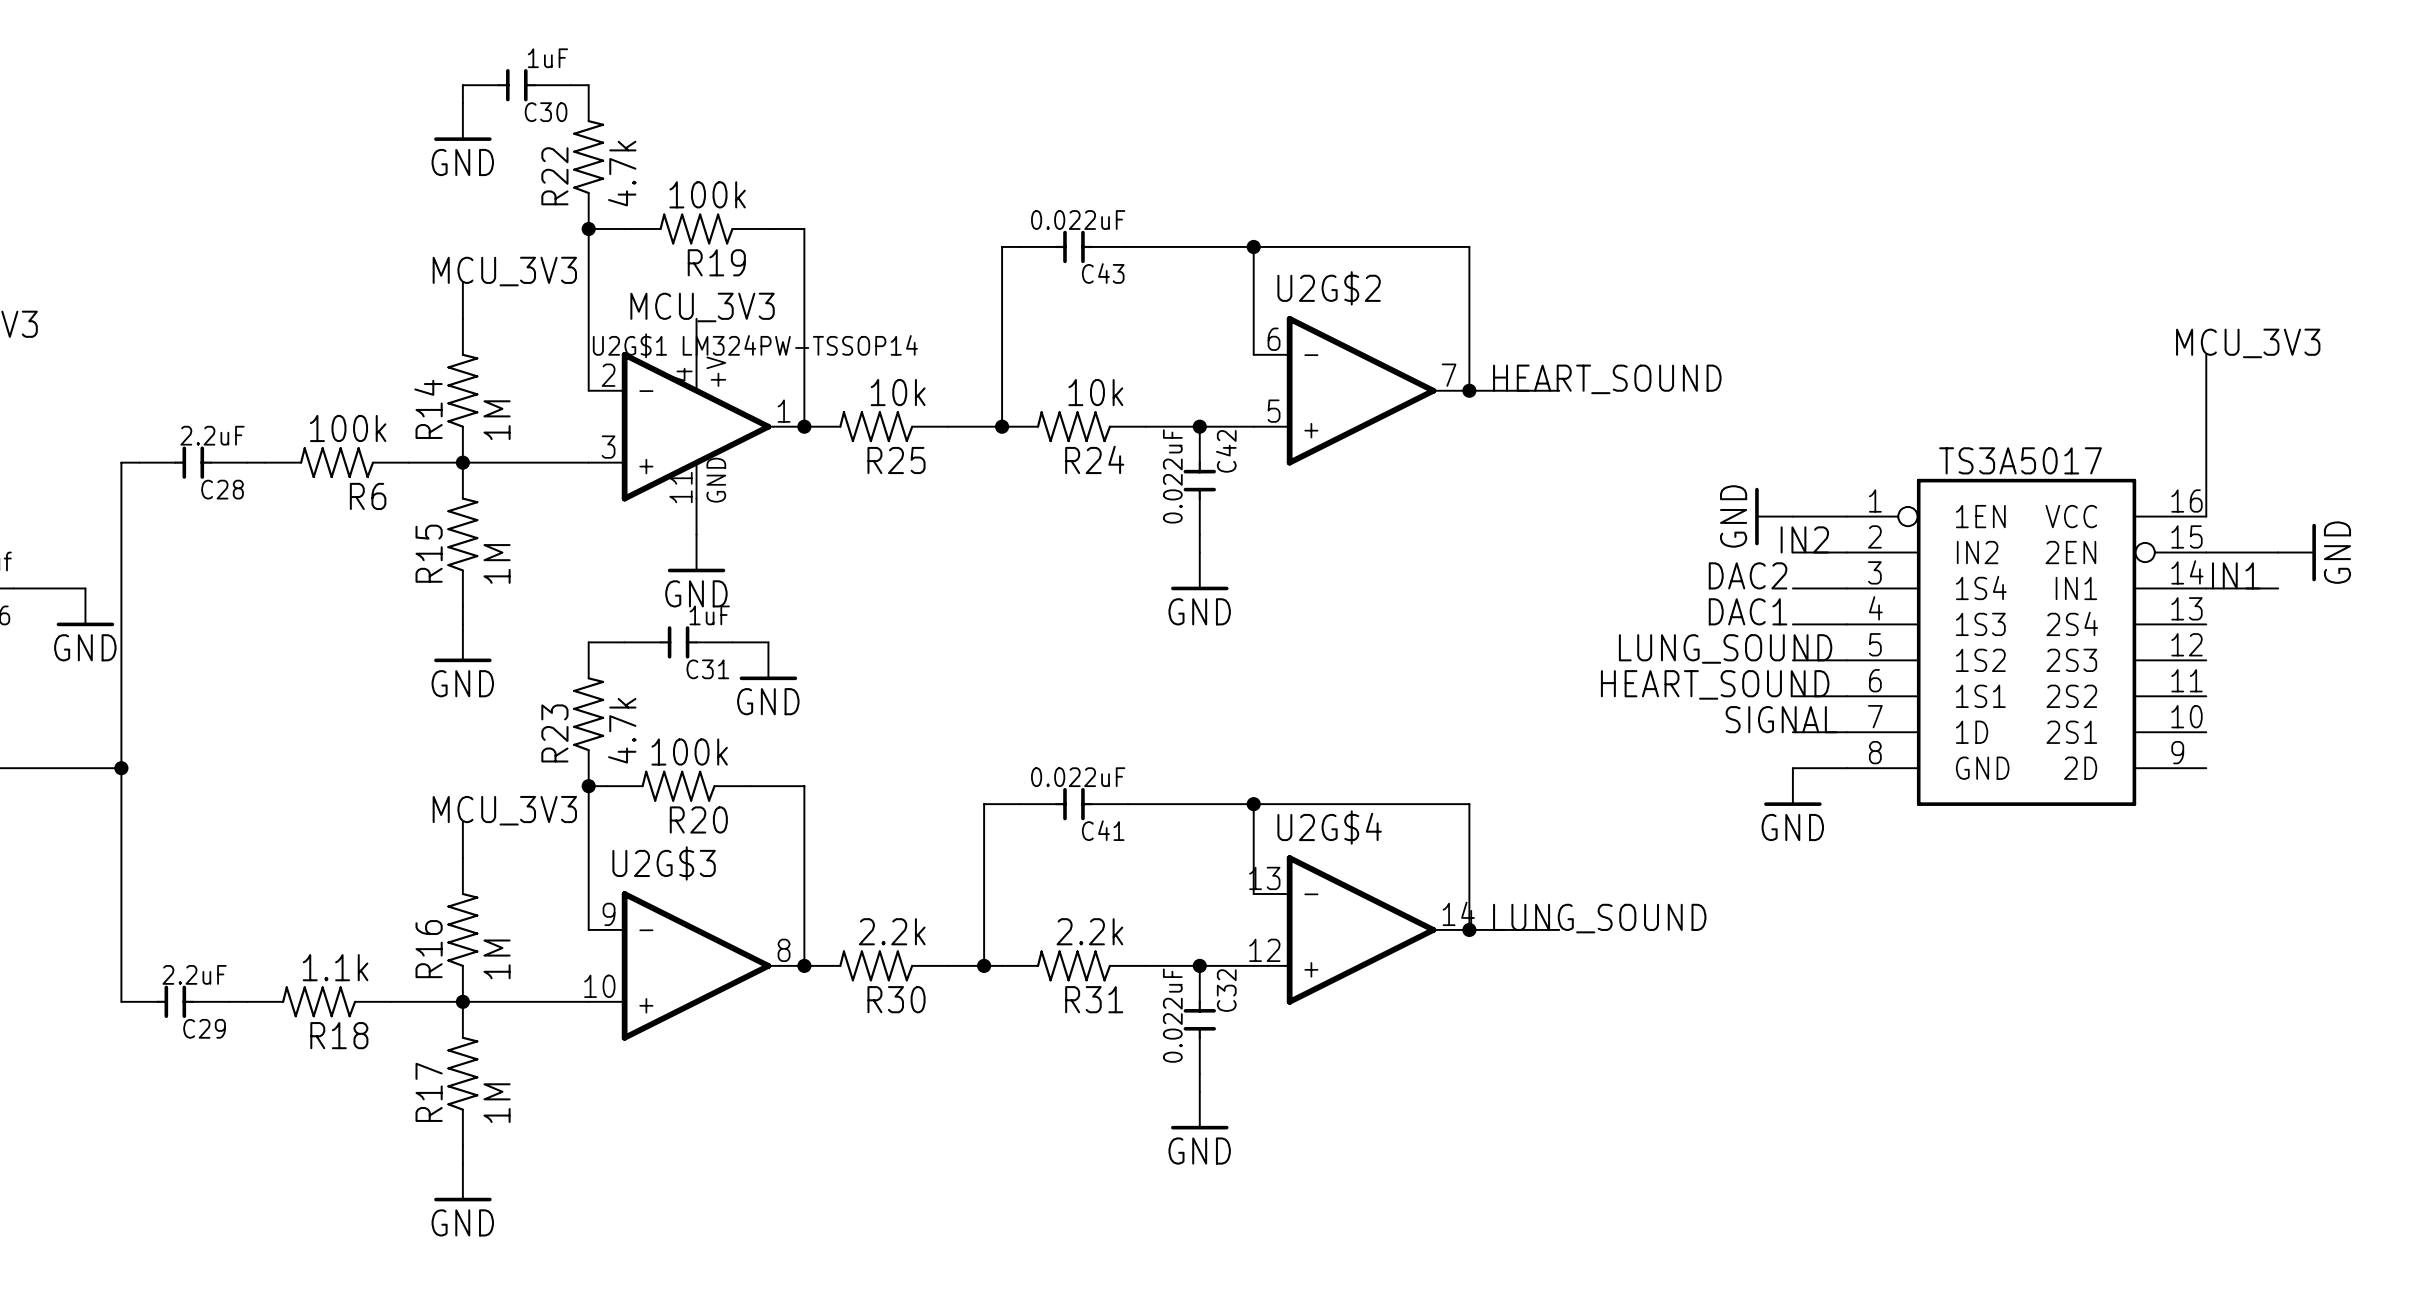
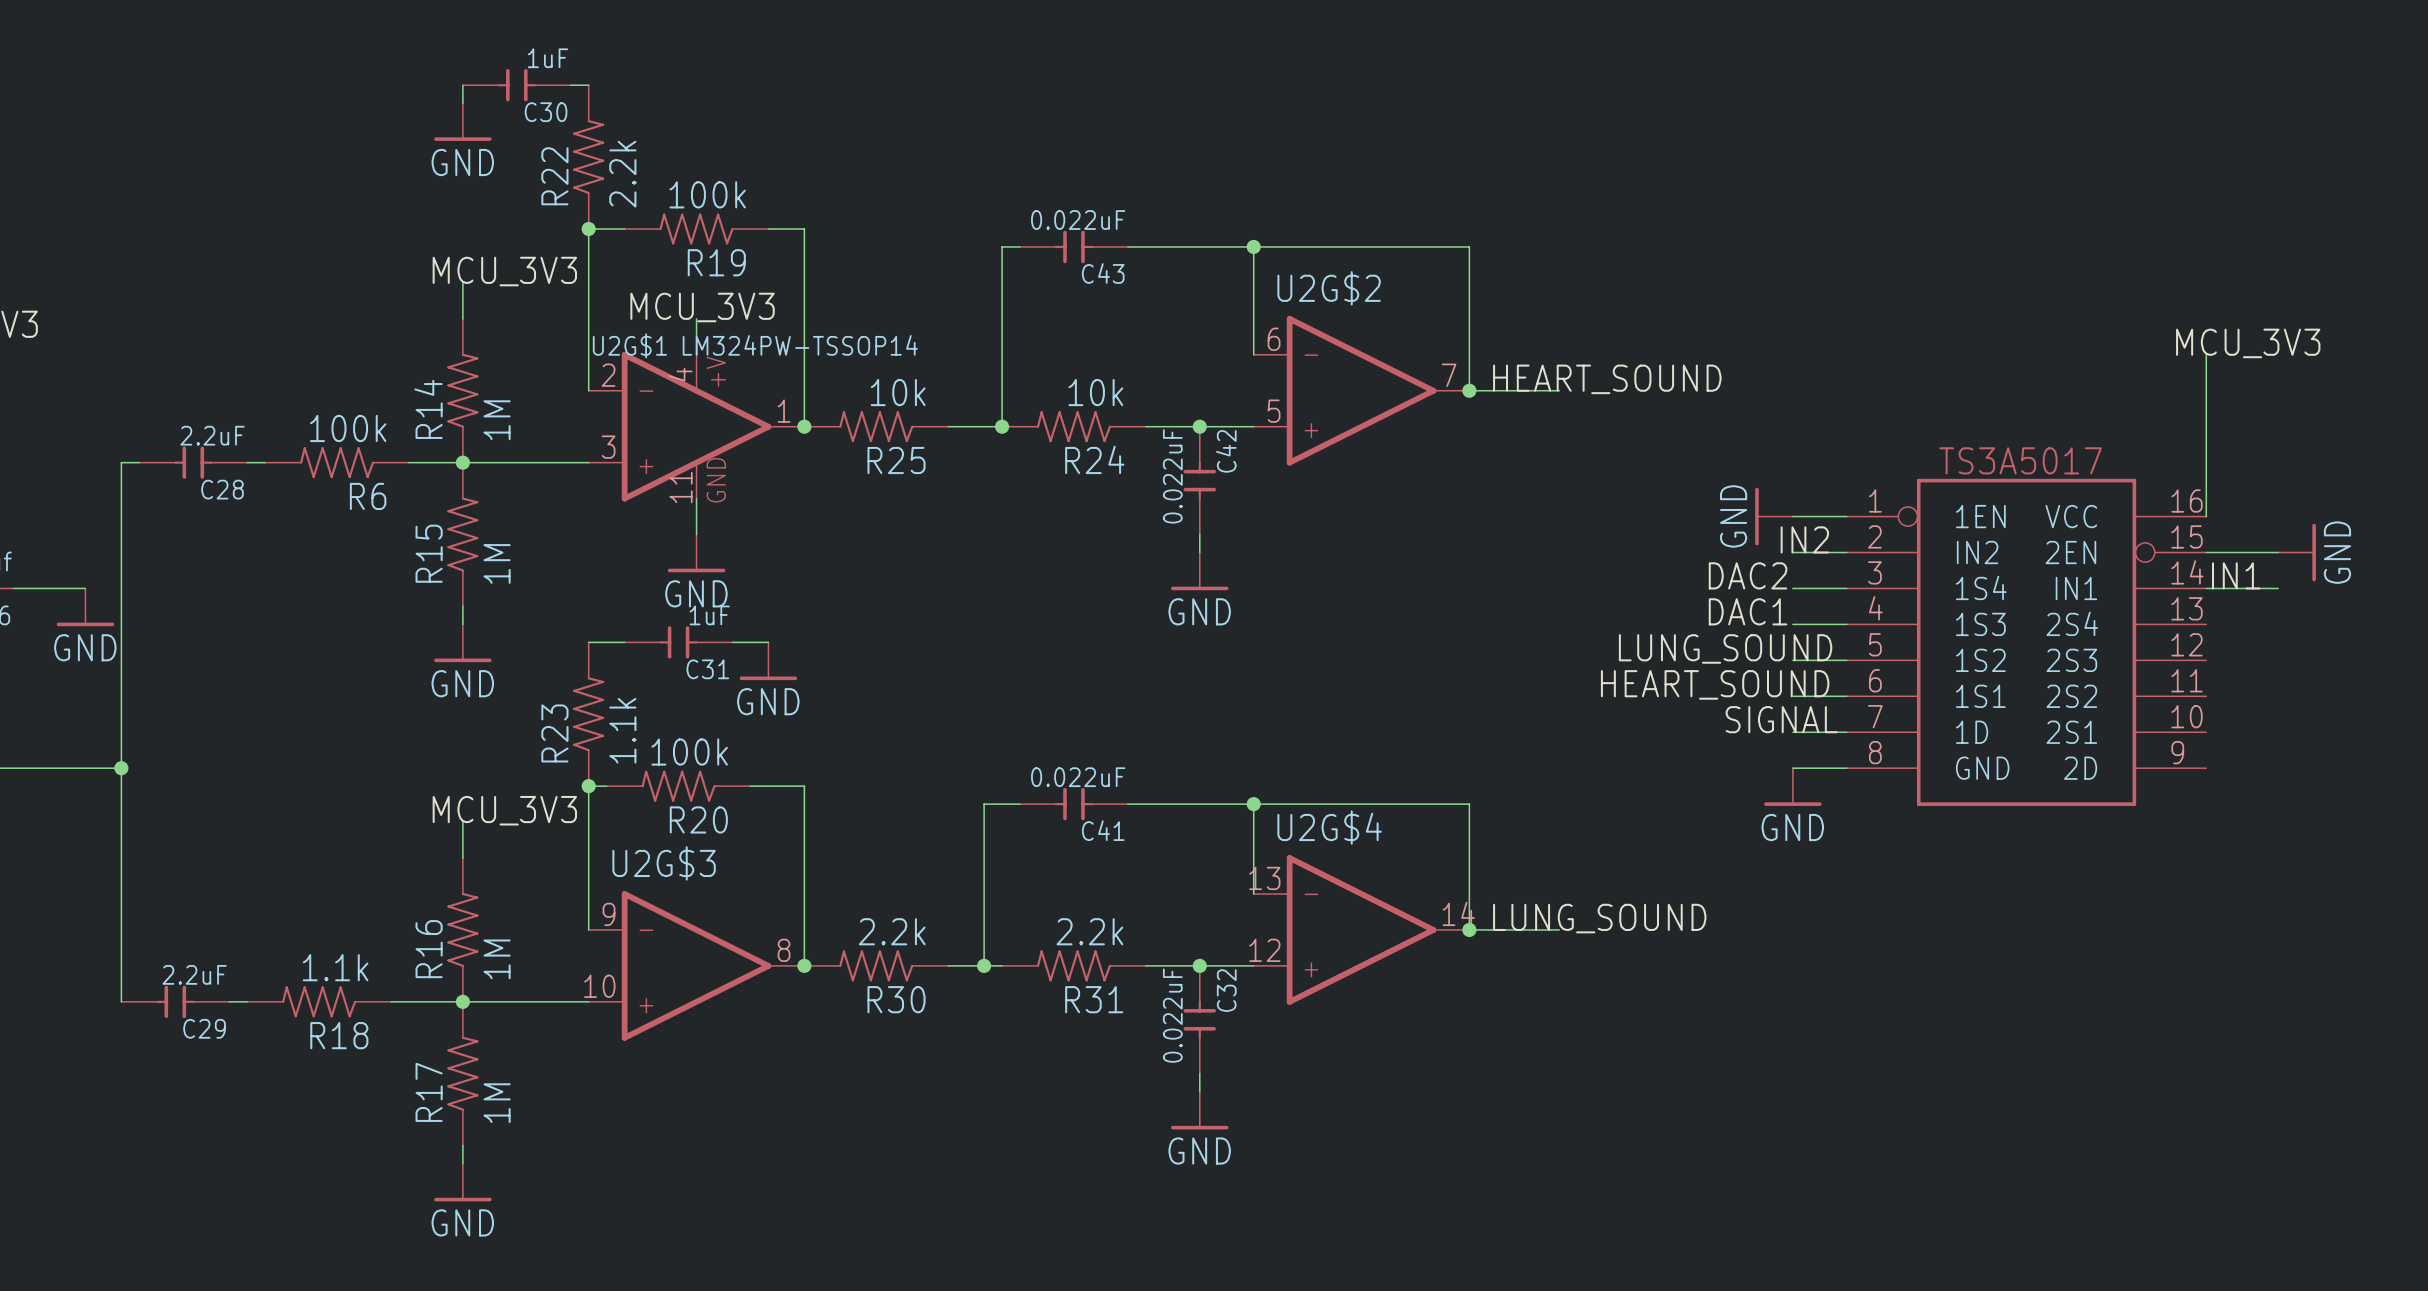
R22 value: 4.7k (622, 173) -> 2.2k (622, 174)
R23 value: 4.7k (622, 730) -> 1.1k (622, 730)

